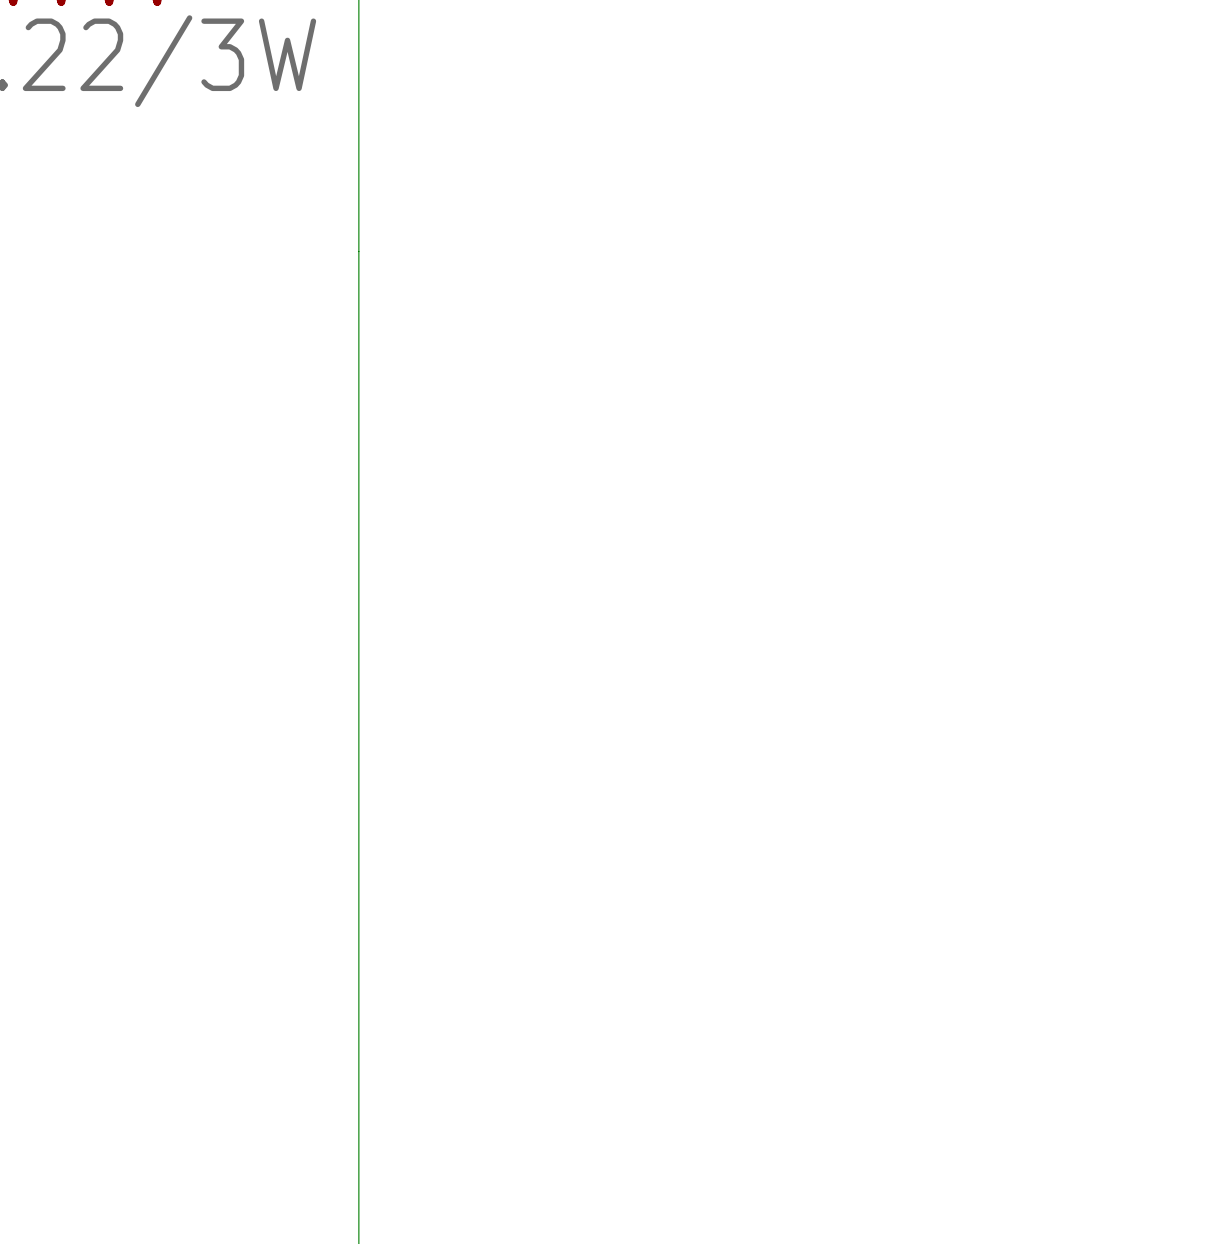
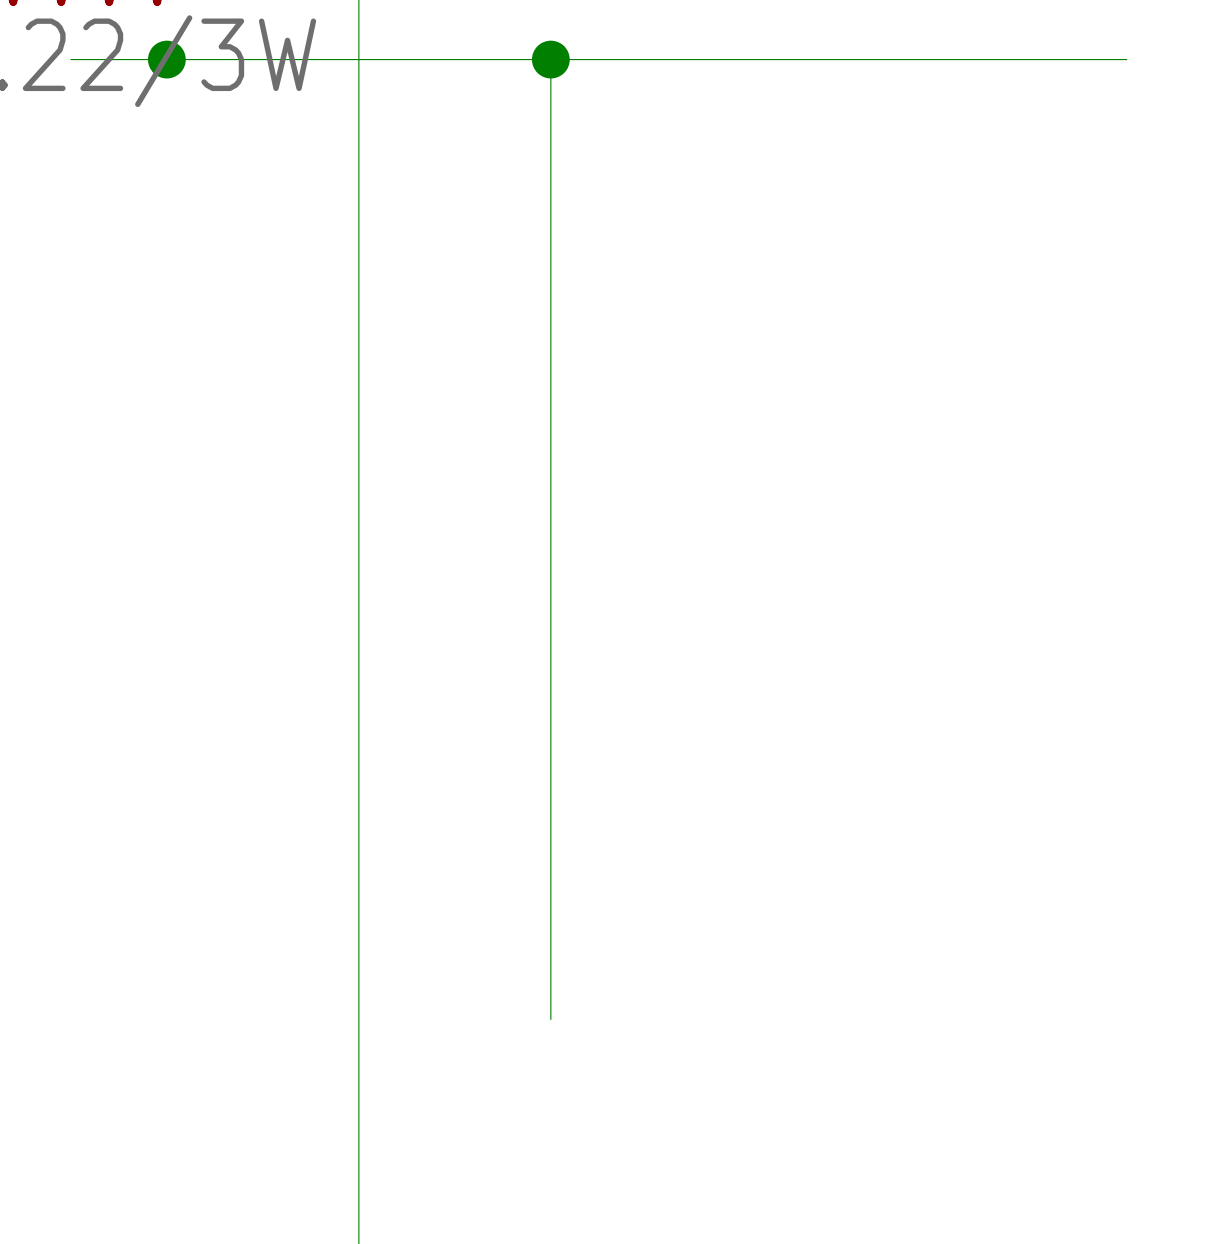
wire: none -> (70, 59) (1126, 59)
junction: none -> (166, 59)
wire: none -> (550, 59) (550, 1019)
junction: none -> (550, 59)

